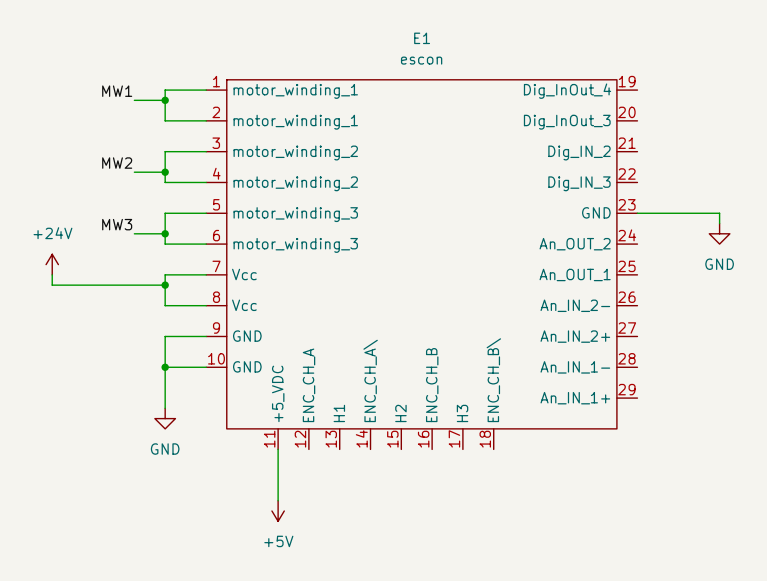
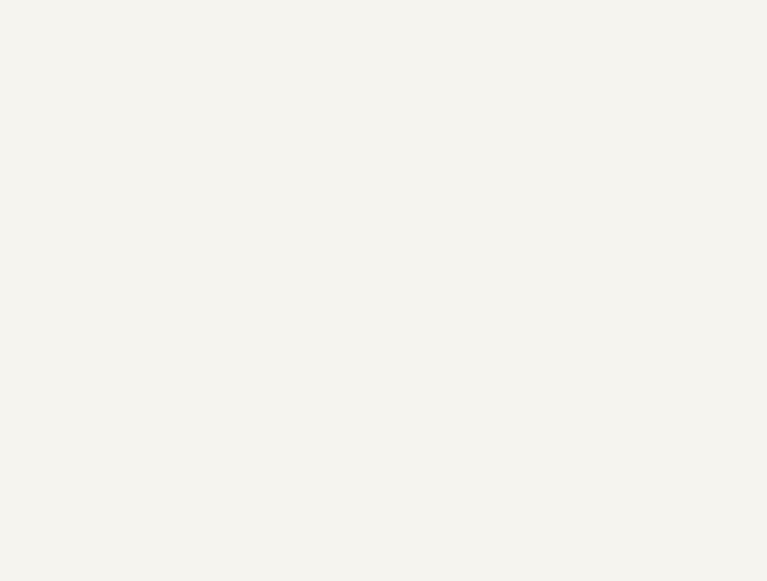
wire: (206, 90) (165, 90) (165, 120) (206, 120) -> none
label: MW1 (117, 91) -> none
wire: (134, 100) (165, 100) -> none
junction: (165, 100) -> none
wire: (206, 151) (165, 151) (165, 182) (206, 182) -> none
label: MW2 (117, 163) -> none
wire: (134, 172) (165, 172) -> none
junction: (165, 172) -> none
wire: (206, 213) (165, 213) (165, 244) (206, 244) -> none
wire: (637, 213) (719, 213) (719, 223) -> none
label: MW3 (117, 224) -> none
wire: (134, 233) (165, 233) -> none
junction: (165, 233) -> none
power symbol: GND (719, 233) -> none
power symbol: +24V (52, 264) -> none
E1: escon (421, 264) -> none
wire: (52, 274) (52, 285) (165, 285) -> none
wire: (206, 274) (165, 274) (165, 305) (206, 305) -> none
junction: (165, 285) -> none
wire: (206, 336) (165, 336) (165, 408) -> none
wire: (165, 367) (206, 367) -> none
junction: (165, 367) -> none
power symbol: GND (165, 418) -> none
wire: (278, 449) (278, 500) -> none
power symbol: +5V (278, 511) -> none

